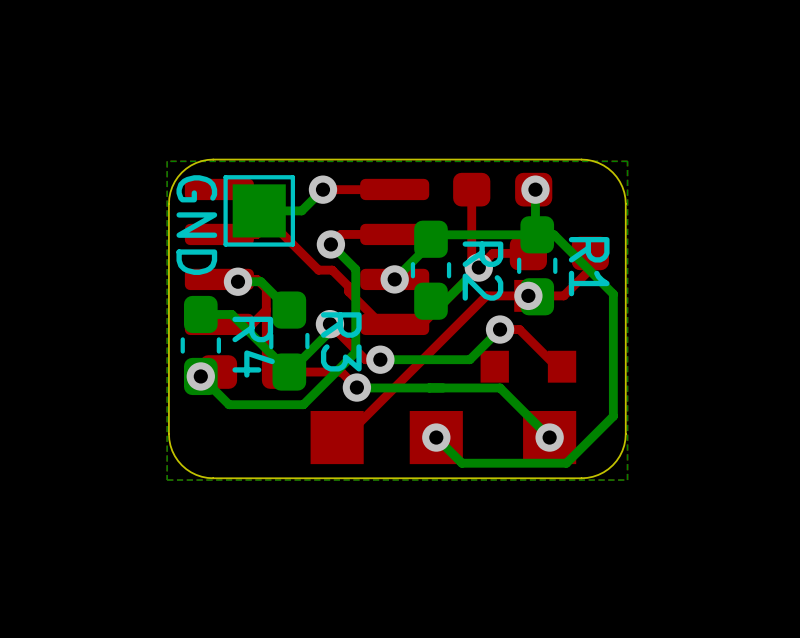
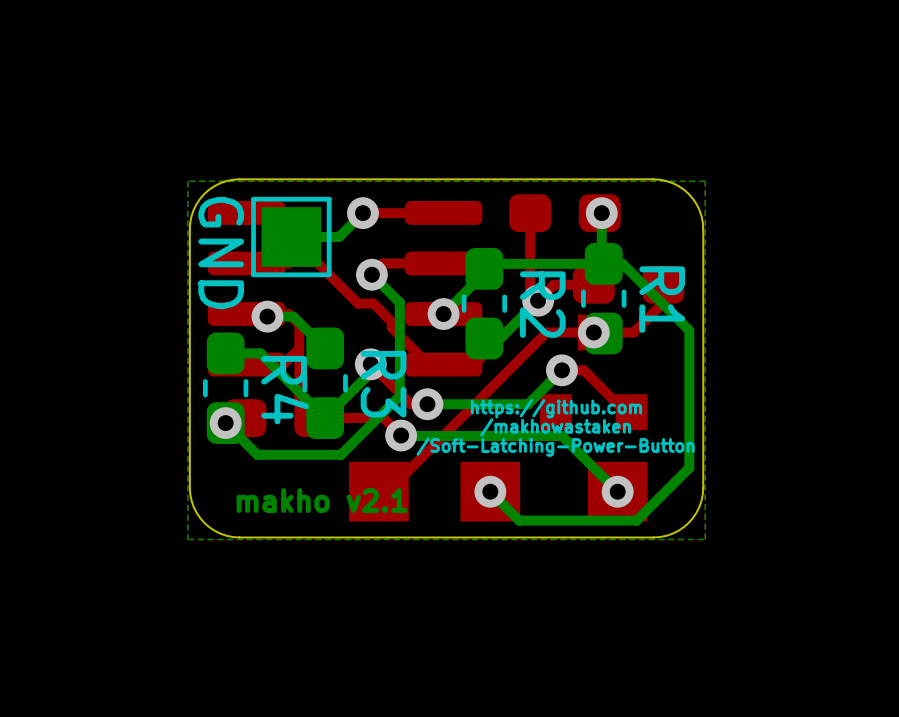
text: none -> https://github.com (556, 408)
text: none -> /makhowastaken (555, 427)
text: none -> /Soft-Latching-Power-Button (555, 447)
text: none -> makho v2.1 (322, 500)

